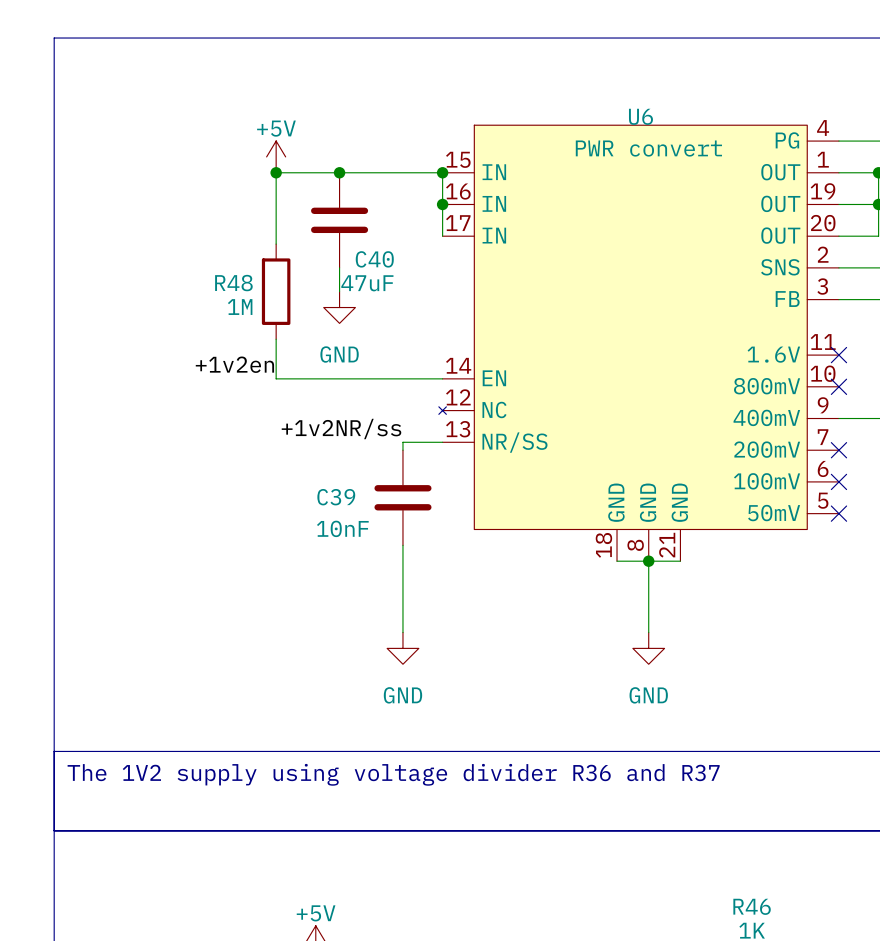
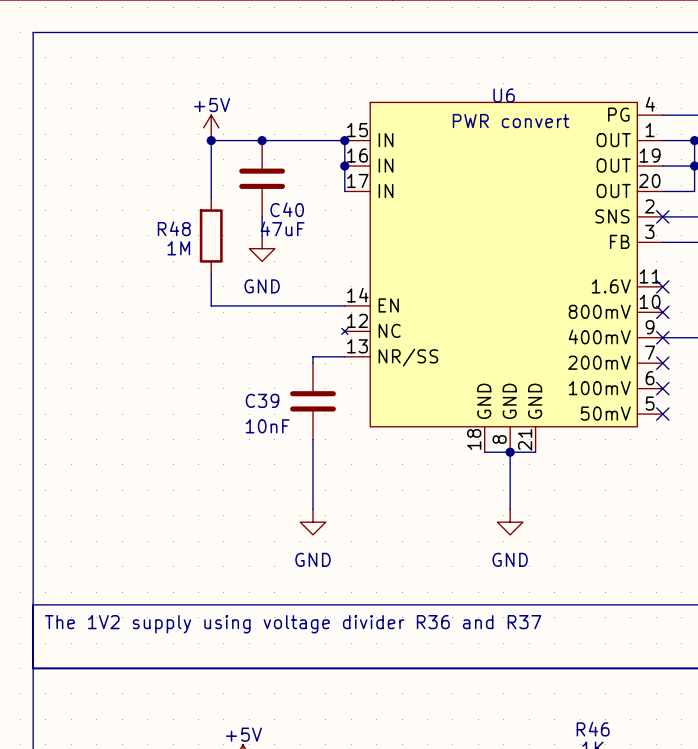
no-connect mark: none -> (662, 216)
label: +1v2en (234, 364) -> none
no-connect mark: none -> (662, 337)
label: +1v2NR/ss (341, 429) -> none

